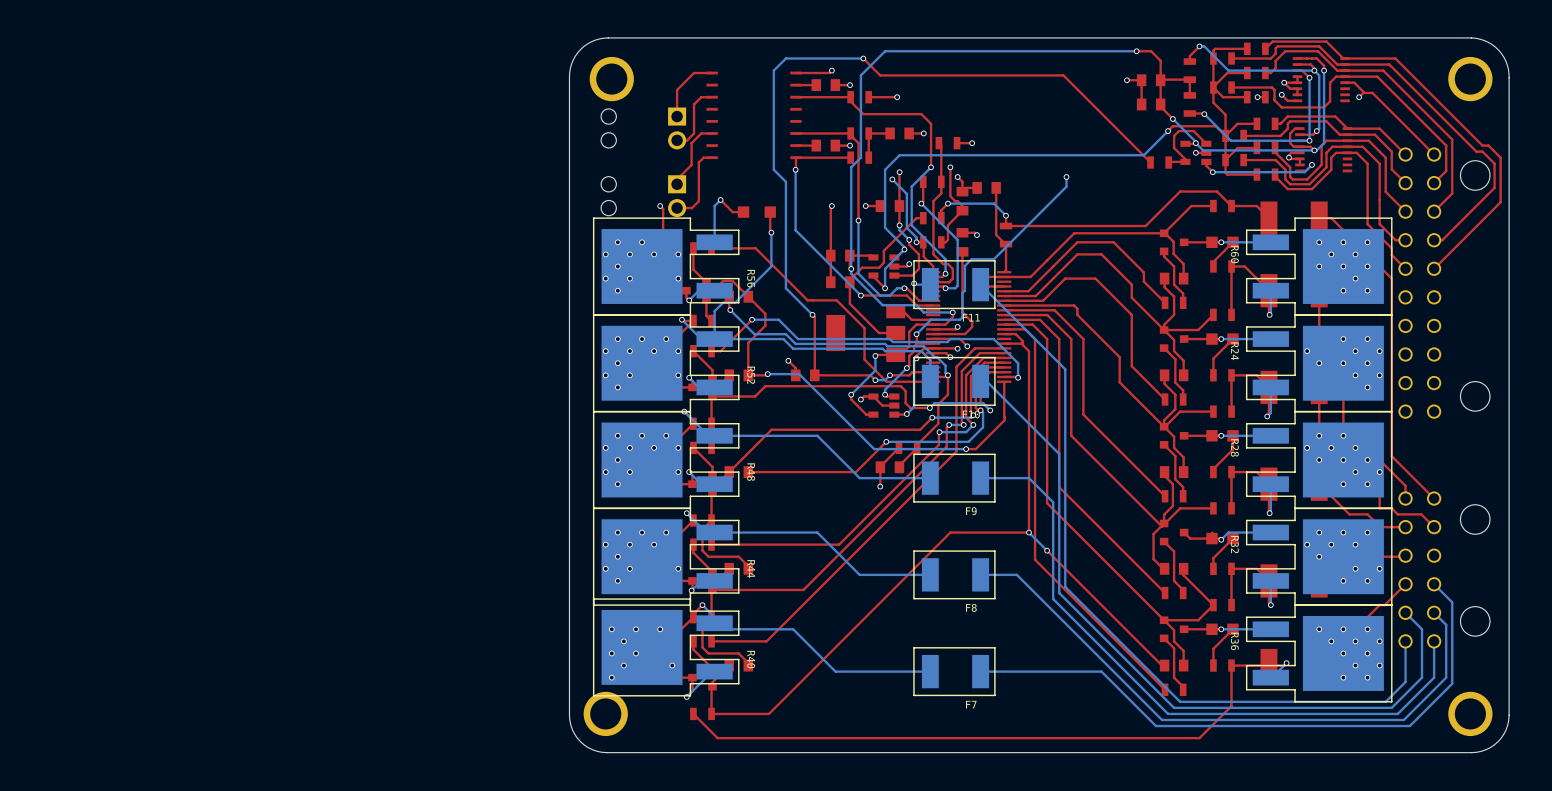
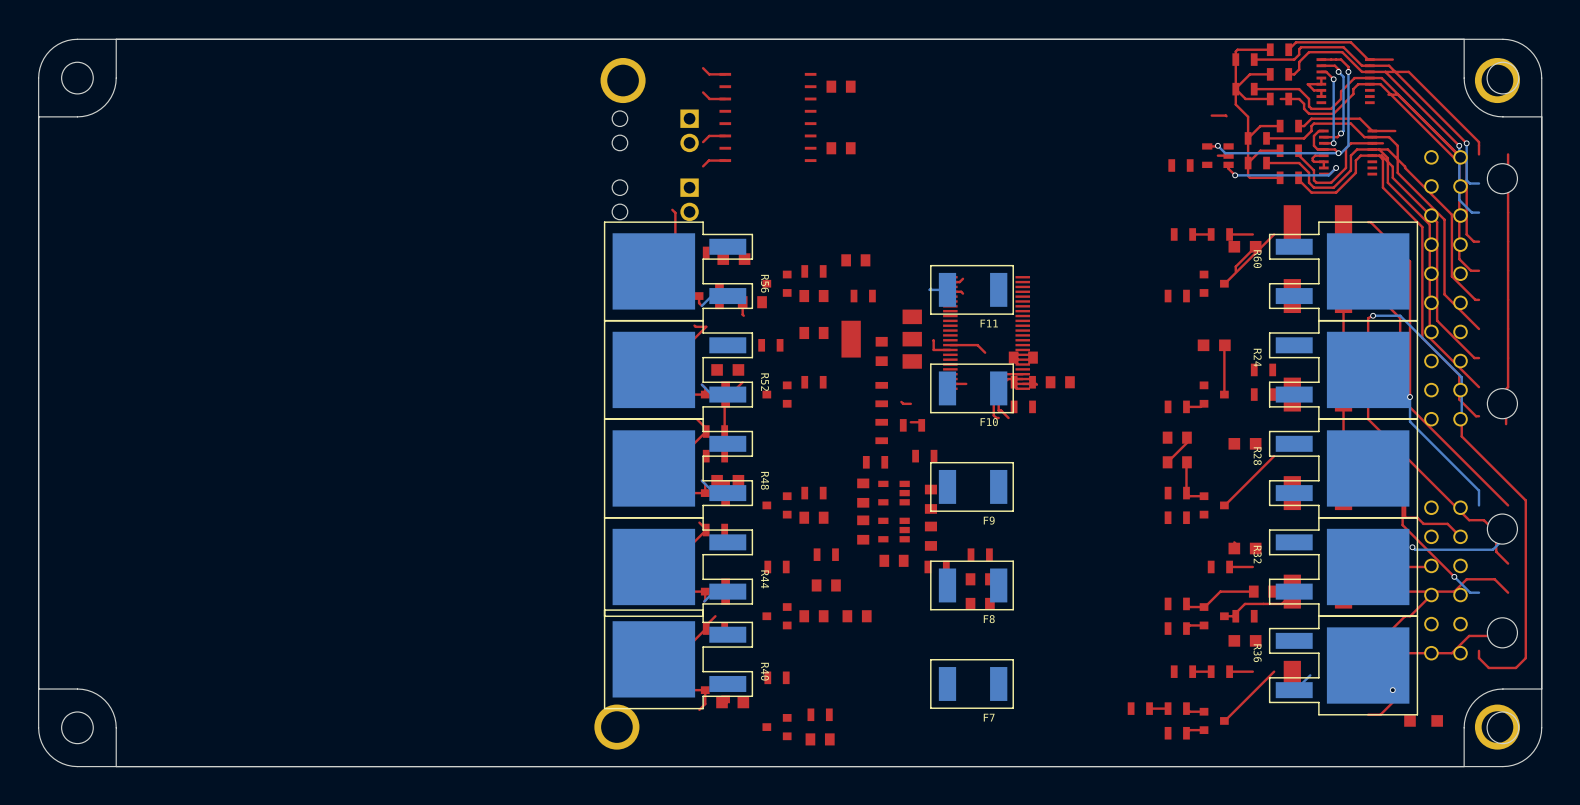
board edge: (1471, 37) (608, 37) (595, 40) (584, 46) (573, 59) (569, 76) (569, 715) (570, 724) (577, 737) (588, 747) (606, 752) (1471, 752) (1481, 751) (1494, 744) (1504, 733) (1509, 715) (1508, 73) (1505, 60) (1495, 47) (1484, 40) (1471, 37) -> (1502, 39) (1517, 42) (1530, 50) (1538, 63) (1541, 78) (1541, 727) (1540, 737) (1533, 751) (1517, 763) (1502, 766) (77, 766) (58, 761) (46, 751) (41, 742) (38, 727) (38, 78) (43, 58) (53, 47) (62, 42) (77, 39) (1502, 39)
board edge: none -> (116, 39) (115, 83) (111, 97) (104, 105) (92, 113) (82, 116) (38, 116)
board edge: none -> (1464, 39) (1464, 83) (1467, 92) (1475, 105) (1488, 113) (1497, 116) (1541, 116)
top track: (1199, 46) (1189, 56) (1189, 61) -> none
bottom track: (1199, 46) (1204, 46) (1228, 70) (1314, 70) -> none
via: (1199, 46) -> none
top track: (1136, 51) (1151, 51) (1160, 60) (1160, 106) (1172, 118) -> none
bottom track: (1136, 51) (885, 51) (860, 75) (860, 157) (851, 167) (851, 273) (882, 305) (916, 305) (923, 312) (952, 312) -> none
via: (1136, 51) -> none
top track: (863, 58) (880, 75) (1063, 75) (1150, 162) -> none
bottom track: (863, 58) (785, 58) (773, 70) (773, 169) (785, 181) (785, 288) (812, 314) -> none
via: (863, 58) -> none
top track: (1367, 58) (1395, 58) (1482, 145) (1488, 145) (1500, 157) (1500, 202) (1434, 268) -> none
round board edge: none -> [61, 61, 94, 95]
round board edge: none -> [1486, 61, 1520, 95]
top track: (1363, 64) (1389, 64) (1476, 151) (1482, 151) (1494, 163) (1494, 187) (1442, 240) (1434, 240) -> (1389, 65) (1466, 143)
top track: (831, 70) (829, 73) (795, 73) -> none
via: (831, 70) -> none
part: (1189, 70) -> none
top track: none -> (1385, 71) (1459, 145)
top track: (696, 73) (694, 73) (677, 89) (677, 116) -> (709, 74) (703, 68)
top track: (1336, 76) (1330, 82) (1330, 101) (1324, 107) (1281, 107) (1274, 100) (1274, 89) (1272, 87) -> (1360, 78) (1354, 78) (1341, 91) (1341, 99) (1331, 108) (1311, 108) (1309, 106) (1309, 99) (1299, 89) (1295, 89)
top track: (1356, 76) (1377, 76) (1446, 145) (1446, 171) (1434, 183) -> (1381, 78) (1466, 163) (1466, 234) (1473, 241) (1478, 241)
top track: (1126, 80) (1141, 80) (1141, 104) -> none
via: (1126, 80) -> none
part: (1151, 80) -> none
top track: (1160, 80) (1189, 79) (1189, 95) -> none
via: (1284, 82) -> none
top track: none -> (1369, 84) (1358, 84) (1353, 89) (1353, 94) (1333, 113) (1309, 113) (1299, 99) (1288, 99)
top track: (1354, 82) (1363, 92) (1359, 97) -> (1379, 84) (1459, 163) (1459, 259) (1470, 270) (1478, 270)
top track: (816, 85) (795, 85) -> none
top track: (850, 85) (835, 85) -> none
via: (850, 85) -> none
top track: (1281, 94) (1287, 100) (1297, 100) -> none
via: (1281, 94) -> none
top track: (701, 97) (694, 104) (694, 133) (687, 140) (677, 140) -> (714, 99) (709, 99) (703, 92)
top track: (795, 97) (850, 97) (850, 101) (863, 114) (921, 114) (931, 123) (931, 167) -> none
part: (859, 97) -> none
top track: (897, 97) (868, 97) -> none
via: (897, 97) -> none
via: (1257, 97) -> none
via: (1359, 97) -> none
part: (1151, 104) -> none
part: (1189, 104) -> none
bottom track: (1204, 114) (1230, 140) (1309, 140) -> none
via: (1204, 114) -> none
bottom track: (1172, 118) (1195, 143) -> none
via: (1172, 118) -> none
top track: (1370, 128) (1379, 128) (1405, 154) -> none
top track: (1168, 131) (1172, 126) (1215, 126) (1225, 135) -> none
bottom track: (1168, 131) (1143, 155) (899, 155) (885, 169) (885, 227) (904, 247) (904, 249) (885, 268) (885, 288) -> none
via: (1168, 131) -> none
top track: (701, 133) (691, 143) (691, 164) (677, 179) (677, 184) -> (714, 135) (709, 135) (703, 142)
top track: (795, 133) (850, 133) (858, 143) (858, 220) -> none
part: (859, 133) -> none
top track: (890, 133) (868, 133) (868, 157) -> none
part: (899, 133) -> none
top track: (923, 133) (909, 133) -> none
via: (923, 133) -> none
top track: (1363, 134) (1374, 134) (1391, 151) (1391, 169) (1405, 183) -> (1389, 137) (1397, 145) (1397, 172) (1444, 219) (1444, 294) (1478, 328)
top track: (1357, 140) (1368, 140) (1385, 157) (1385, 191) (1405, 211) -> none
bottom track: none -> (1466, 143) (1466, 180) (1469, 183) (1478, 183)
via: none -> (1466, 143)
top track: (938, 143) (941, 145) (941, 193) (933, 201) (933, 254) (943, 264) (947, 264) (952, 268) (952, 278) (949, 282) (933, 281) -> none
part: (947, 143) -> none
top track: (972, 143) (957, 143) -> none
via: (972, 143) -> none
top track: (1206, 143) (1193, 131) (1178, 131) (1174, 135) (1174, 147) (1185, 159) (1185, 161) (1168, 162) -> none
bottom track: none -> (1459, 145) (1459, 199) (1471, 212) (1478, 212)
via: none -> (1459, 145)
top track: (816, 145) (795, 145) -> none
top track: (850, 145) (835, 145) -> none
via: (850, 145) -> none
top track: none -> (1379, 149) (1387, 158) (1387, 182) (1429, 224) (1429, 337) (1478, 387)
top track: (1452, 151) (1452, 193) (1434, 211) -> none
top track: none -> (1508, 154) (1508, 387) (1506, 389) (1506, 424)
via: (1195, 152) -> none
top track: none -> (1379, 155) (1382, 159) (1382, 187) (1422, 227) (1422, 337) (1459, 374) (1459, 399) (1476, 416) (1478, 416)
top track: (703, 157) (698, 162) (698, 201) (691, 208) (677, 208) -> (716, 160) (708, 160) (703, 166)
top track: (850, 157) (795, 157) (795, 169) -> none
part: (859, 157) -> none
via: (1288, 157) -> none
top track: (1379, 164) (1379, 224) (1395, 240) (1405, 240) -> (1405, 167) (1451, 214) (1451, 276) (1475, 299) (1478, 299)
bottom track: (931, 167) (911, 186) (911, 225) (945, 259) (945, 273) -> none
via: (931, 167) -> none
top track: (950, 167) (950, 196) (962, 206) (962, 210) (947, 225) (947, 239) (941, 242) -> none
via: (950, 167) -> none
bottom track: (795, 169) (795, 230) (860, 295) -> none
via: (795, 169) -> none
top track: (899, 172) (899, 225) -> none
via: (899, 172) -> none
top track: (1367, 174) (1367, 224) (1391, 248) (1391, 255) (1405, 268) -> (1392, 177) (1437, 222) (1437, 320) (1474, 358) (1478, 358)
top track: (957, 177) (962, 181) (962, 191) (966, 187) (977, 187) -> none
via: (957, 177) -> none
bottom track: (1066, 177) (1066, 186) (993, 259) (971, 259) (964, 265) (962, 317) (960, 319) (931, 319) (916, 334) -> none
via: (1066, 177) -> none
bottom track: (892, 179) (906, 193) (906, 227) (916, 237) (916, 242) -> none
via: (892, 179) -> none
top track: (923, 181) (923, 201) (921, 203) -> none
part: (932, 181) -> none
part: (986, 187) -> none
top track: (996, 187) (996, 234) (1006, 244) (1006, 270) (1004, 272) -> none
top track: (720, 199) (732, 212) (743, 212) -> none
bottom track: (720, 199) (714, 205) (714, 242) -> none
via: (720, 199) -> none
part: (962, 201) -> none
bottom track: (921, 203) (957, 239) (957, 285) (955, 288) (945, 288) -> none
via: (921, 203) -> none
top track: (947, 203) (941, 210) (941, 218) -> none
bottom track: (947, 203) (993, 203) (1006, 215) -> none
via: (947, 203) -> none
via: (660, 206) -> none
top track: (831, 206) (830, 282) -> none
via: (831, 206) -> none
via: (865, 206) -> none
top track: (880, 206) (865, 206) -> none
part: (889, 206) -> none
top track: (1213, 206) (1191, 206) (1164, 233) -> none
part: (1222, 206) -> none
part: (756, 212) -> none
top track: (770, 212) (771, 232) -> none
top track: (1006, 215) (1006, 226) (1145, 226) (1180, 191) (1217, 191) (1231, 206) (1256, 206) (1268, 218) -> none
via: (1006, 215) -> none
top track: (923, 218) (916, 218) (883, 250) (883, 262) (879, 267) (862, 267) (849, 279) (849, 303) (879, 333) (895, 333) -> none
part: (932, 218) -> none
top track: (1313, 218) (1331, 218) (1391, 278) (1391, 456) (1434, 498) -> none
top track: none -> (1368, 222) (1370, 222) (1410, 261) (1410, 397)
bottom track: (858, 220) (858, 273) (880, 295) (889, 295) (897, 288) (904, 288) -> none
via: (858, 220) -> none
bottom track: (899, 225) (899, 230) (909, 239) -> none
via: (899, 225) -> none
part: none -> (1183, 234)
top track: none -> (1211, 234) (1192, 234)
part: none -> (1220, 234)
top track: none -> (1252, 234) (1229, 234)
top track: none -> (1274, 234) (1224, 283)
bottom track: (771, 232) (771, 266) (735, 302) (723, 302) (714, 311) (714, 339) -> none
via: (771, 232) -> none
top track: (962, 232) (974, 232) (977, 235) -> none
via: (977, 235) -> none
part: (1006, 235) -> none
top track: (909, 239) (909, 244) (918, 254) (918, 268) (912, 275) (894, 275) -> none
via: (909, 239) -> none
via: (617, 242) -> none
via: (642, 242) -> none
top track: (916, 242) (923, 242) (923, 256) (933, 266) (933, 272) -> none
via: (916, 242) -> none
part: (932, 242) -> none
part: (962, 242) -> none
part: (1174, 242) -> none
top track: (1221, 242) (1184, 242) -> none
via: (1221, 242) -> none
bottom track: (1270, 242) (1221, 242) -> none
via: (1319, 242) -> none
via: (1343, 242) -> none
via: (1367, 242) -> none
top track: (693, 248) (693, 269) (706, 281) -> none
top track: (711, 248) (755, 248) (807, 300) (836, 300) (864, 328) (864, 359) (886, 381) (933, 381) -> none
via: (904, 249) -> none
top track: (962, 251) (962, 312) (972, 322) (972, 326) (965, 334) (933, 334) -> none
top track: (1164, 251) (1164, 256) (1174, 266) (1174, 284) (1183, 293) (1183, 302) -> none
via: (605, 254) -> none
via: (629, 254) -> none
via: (654, 254) -> none
via: (678, 254) -> none
part: none -> (733, 259)
via: (1331, 254) -> none
via: (1355, 254) -> none
top track: (873, 257) (871, 255) (849, 255) (851, 268) -> none
top track: (909, 264) (906, 266) (894, 266) -> none
via: (909, 264) -> none
via: (617, 266) -> none
part: none -> (813, 271)
part: (883, 266) -> none
part: (1222, 266) -> none
via: (1319, 266) -> none
via: (1343, 266) -> none
via: (1367, 266) -> none
via: (851, 268) -> none
via: (945, 273) -> none
top track: (873, 275) (885, 288) -> none
via: (605, 278) -> none
via: (629, 278) -> none
via: (678, 278) -> none
part: none -> (777, 283)
top track: (1164, 278) (1164, 287) (1174, 296) (1174, 314) (1164, 324) (1164, 330) (1198, 330) (1213, 314) -> none
part: (1174, 278) -> none
top track: (1183, 278) (1183, 263) (1173, 253) (1173, 241) (1165, 233) (1074, 233) (1030, 276) (988, 276) (986, 278) (988, 286) (1004, 286) -> none
part: none -> (1214, 283)
top track: none -> (1368, 283) (1368, 286) (1400, 318) (1400, 397) (1508, 505)
via: (1355, 278) -> none
part: (840, 282) -> none
via: (914, 283) -> none
bottom track: (980, 284) (1065, 369) (1065, 586) (1180, 701) (1385, 701) (1405, 682) (1405, 641) -> none
via: (885, 288) -> none
top track: (904, 288) (906, 288) (919, 300) (933, 300) -> none
via: (904, 288) -> none
via: (945, 288) -> none
via: (617, 290) -> none
part: none -> (813, 296)
part: none -> (863, 296)
bottom track: (1270, 290) (1269, 314) -> none
via: (1343, 290) -> none
via: (1367, 290) -> none
top track: (1004, 291) (1028, 291) (1077, 242) (1113, 242) (1143, 272) (1143, 281) (1165, 302) -> none
top track: (860, 295) (906, 295) (916, 305) (933, 305) -> none
via: (860, 295) -> none
top track: (1004, 296) (1035, 296) (1077, 254) (1101, 254) (1131, 284) (1131, 297) (1174, 340) (1174, 351) (1183, 360) (1183, 375) -> none
via: (689, 300) -> none
top track: (1004, 300) (1043, 300) (1065, 278) (1095, 278) (1131, 314) (1131, 366) (1165, 399) -> (1204, 403) (1200, 406) (1186, 406)
part position: (1174, 302) -> (1177, 296)
top track: (1004, 305) (1074, 305) (1077, 308) (1077, 314) (1119, 357) (1119, 382) (1174, 436) (1174, 447) (1183, 457) (1183, 472) -> none
bottom track: (730, 310) (754, 334) (785, 334) (795, 343) (885, 343) (887, 346) (923, 346) (945, 365) (945, 372) (947, 375) -> none
via: (730, 310) -> none
top track: (1004, 310) (1054, 310) (1083, 339) (1083, 414) (1165, 496) -> none
top track: none -> (1373, 315) (1368, 318) (1368, 345)
bottom track: none -> (1373, 315) (1400, 315) (1461, 377) (1461, 419)
via: none -> (1373, 315)
top track: (895, 311) (903, 311) (911, 319) (933, 319) -> none
top track: (952, 312) (952, 317) (945, 324) (916, 324) (909, 331) (909, 346) (900, 354) (875, 355) -> none
via: (952, 312) -> none
top track: (812, 314) (814, 317) (814, 375) (870, 375) (875, 380) -> none
via: (812, 314) -> none
part: (1222, 314) -> none
top track: (1269, 314) (1268, 290) (1244, 266) (1231, 266) (1231, 314) -> none
via: (1269, 314) -> none
top track: (1004, 315) (1047, 315) (1071, 339) (1071, 435) (1162, 526) (1164, 523) -> none
bottom track: (681, 319) (701, 339) (783, 339) (793, 348) (882, 348) (885, 351) (921, 351) (930, 360) (930, 381) -> none
via: (681, 319) -> none
top track: (752, 319) (720, 351) (711, 351) -> none
bottom track: (752, 319) (778, 319) (798, 339) (889, 339) (892, 342) (947, 342) (950, 339) (993, 339) (1018, 363) (1018, 377) -> none
via: (752, 319) -> none
top track: (1004, 319) (1039, 319) (1059, 339) (1059, 487) (1165, 593) -> (1253, 591) (1220, 591) (1204, 607) (1189, 607) (1186, 603)
part: (702, 320) -> none
top track: (711, 320) (706, 315) (706, 297) (723, 281) (732, 281) (765, 313) (765, 325) (748, 342) (748, 375) (767, 374) -> none
top track: (1004, 324) (1032, 324) (1047, 339) (1047, 503) (1174, 630) (1174, 641) (1183, 650) (1183, 665) -> none
part: none -> (813, 332)
top track: (957, 326) (955, 329) (933, 329) -> none
via: (957, 326) -> none
top track: (1004, 329) (1025, 329) (1035, 339) (1035, 559) (1165, 689) -> none
via: (916, 334) -> none
top track: (1004, 334) (1015, 334) (1022, 341) (1022, 345) -> none
via: (617, 339) -> none
via: (642, 339) -> none
via: (666, 339) -> none
part: none -> (770, 345)
part: (1174, 339) -> none
top track: none -> (1224, 345) (1224, 394)
top track: (1221, 339) (1184, 339) -> none
via: (1221, 339) -> none
part position: (1222, 339) -> (1214, 345)
top track: (1232, 339) (1213, 358) (1213, 375) -> none
bottom track: (1270, 339) (1221, 339) -> none
via: (1343, 339) -> none
via: (1367, 339) -> none
top track: (916, 343) (914, 346) (914, 351) (909, 355) (909, 365) (906, 368) -> none
top track: (1004, 343) (1021, 343) (1029, 351) (1029, 532) (950, 532) (769, 713) (711, 713) (712, 682) (729, 665) -> none
part: none -> (881, 351)
via: (967, 346) -> none
top track: (957, 348) (924, 348) (916, 358) -> none
via: (957, 348) -> none
top track: (1004, 348) (974, 348) (956, 366) (956, 451) (766, 641) (711, 641) -> none
top track: (1164, 348) (1175, 359) (1175, 382) (1183, 390) (1183, 399) -> none
via: (605, 351) -> none
via: (629, 351) -> none
via: (654, 351) -> none
via: (678, 351) -> none
top track: (693, 351) (712, 370) (712, 378) -> none
part: (702, 351) -> none
part: none -> (1023, 357)
via: (1307, 351) -> none
via: (1355, 351) -> none
via: (1379, 351) -> none
top track: (1004, 353) (979, 353) (961, 371) (961, 423) (963, 424) -> none
bottom track: (875, 355) (875, 370) (851, 394) -> none
via: (875, 355) -> none
top track: (950, 357) (946, 353) (933, 353) (933, 357) -> none
via: (950, 357) -> none
top track: (1004, 357) (983, 357) (966, 375) (966, 417) (973, 424) -> none
bottom track: (916, 358) (914, 360) (914, 406) (906, 414) -> none
via: (916, 358) -> none
top track: (788, 360) (795, 368) (795, 375) -> none
via: (788, 360) -> none
top track: (1004, 362) (984, 362) (970, 376) (970, 412) (973, 415) -> none
via: (617, 363) -> none
part: none -> (727, 369)
part: none -> (1263, 369)
via: (1319, 363) -> none
via: (1343, 363) -> none
via: (1367, 363) -> none
bottom track: (906, 368) (885, 389) (885, 394) -> none
via: (906, 368) -> none
part footprint: [791, 369, 820, 382] -> [801, 375, 827, 389]
top track: (933, 372) (912, 372) (909, 375) (889, 375) -> none
bottom track: (767, 374) (799, 374) (874, 449) (966, 449) -> none
via: (767, 374) -> none
via: (605, 375) -> none
via: (629, 375) -> none
via: (678, 375) -> none
part: (738, 375) -> none
bottom track: (889, 375) (885, 380) (875, 380) -> none
via: (889, 375) -> none
top track: (947, 375) (947, 394) (938, 404) (938, 423) (917, 444) (917, 447) (899, 467) -> none
via: (947, 375) -> none
part: none -> (1023, 382)
part: none -> (1060, 382)
top track: (1164, 375) (1164, 383) (1175, 394) (1175, 409) (1164, 420) (1164, 426) (1180, 411) (1213, 411) -> none
part: (1174, 375) -> none
part: (1222, 375) -> none
via: (1355, 375) -> none
via: (1379, 375) -> none
via: (689, 377) -> none
via: (1018, 377) -> none
via: (875, 380) -> none
bottom track: (980, 381) (986, 381) (1059, 453) (1059, 593) (1174, 707) (1391, 707) (1422, 677) (1422, 629) (1405, 612) -> none
top track: (1004, 381) (1004, 420) (975, 449) (966, 449) -> none
via: (617, 387) -> none
part: none -> (777, 394)
part: none -> (881, 394)
part: none -> (1214, 394)
part: none -> (1263, 394)
bottom track: (1270, 387) (1270, 412) (1267, 416) -> none
via: (1367, 387) -> none
bottom track: none -> (1410, 397) (1410, 421) (1478, 490) (1478, 505)
via: none -> (1410, 397)
top track: (851, 394) (851, 399) (866, 414) (873, 414) -> none
via: (851, 394) -> none
via: (885, 394) -> none
top track: (712, 396) (755, 396) (765, 386) (900, 386) (905, 391) (905, 403) (910, 407) (929, 407) -> none
top track: (860, 399) (863, 396) (873, 396) (882, 405) (894, 405) -> none
via: (860, 399) -> none
part: none -> (1023, 406)
part position: (1174, 399) -> (1177, 406)
part: (883, 405) -> none
bottom track: (929, 407) (934, 403) (983, 403) (990, 410) -> none
via: (929, 407) -> none
bottom track: (980, 410) (983, 412) (983, 427) (968, 441) (886, 441) -> none
via: (980, 410) -> none
via: (990, 410) -> none
bottom track: (684, 411) (708, 435) (817, 435) (859, 478) (930, 478) -> none
via: (684, 411) -> none
part: (1222, 411) -> none
top track: (1231, 411) (1231, 375) (1256, 375) (1268, 387) (1268, 414) (1267, 416) -> none
top track: (1343, 411) (1343, 423) (1405, 485) (1405, 498) -> (1368, 419) (1469, 520) (1483, 520) (1496, 532) (1496, 551) (1508, 563)
top track: none -> (1461, 419) (1461, 436) (1525, 500) (1525, 658) (1515, 667) (1488, 667) (1478, 658) (1478, 650)
via: (906, 414) -> none
bottom track: (973, 415) (970, 417) (932, 417) -> none
via: (973, 415) -> none
via: (1267, 416) -> none
part: none -> (912, 425)
top track: (932, 417) (920, 429) (771, 429) (712, 488) (711, 520) (702, 529) (702, 550) (708, 556) (738, 556) (748, 566) (748, 568) -> none
via: (932, 417) -> none
part: none -> (881, 431)
top track: (949, 424) (946, 427) (946, 446) (803, 589) (712, 589) -> none
via: (949, 424) -> none
bottom track: (963, 424) (949, 424) -> none
via: (963, 424) -> none
bottom track: (973, 424) (966, 432) (939, 432) -> none
via: (973, 424) -> none
part: none -> (1177, 437)
top track: none -> (1186, 437) (1186, 442) (1167, 462)
top track: (939, 432) (938, 444) (839, 544) (711, 544) -> none
via: (939, 432) -> none
via: (617, 435) -> none
via: (642, 435) -> none
via: (666, 435) -> none
part: (1174, 435) -> none
top track: (1221, 435) (1184, 435) -> none
via: (1221, 435) -> none
top track: (1232, 435) (1232, 449) (1213, 469) (1213, 472) -> none
bottom track: (1270, 435) (1221, 435) -> none
via: (1319, 435) -> none
via: (1343, 435) -> none
top track: (886, 441) (856, 472) (748, 472) -> none
via: (886, 441) -> none
top track: (1164, 444) (1175, 456) (1175, 479) (1183, 487) (1183, 496) -> none
via: (605, 447) -> none
via: (629, 447) -> none
via: (654, 447) -> none
via: (678, 447) -> none
top track: (693, 447) (712, 466) (712, 475) -> none
top track: (899, 447) (880, 466) (880, 486) -> none
top track: none -> (1274, 456) (1224, 505)
via: (1307, 447) -> none
via: (1331, 447) -> none
via: (1355, 447) -> none
via: (966, 449) -> none
part: none -> (875, 462)
part: none -> (1177, 462)
top track: none -> (1186, 462) (1186, 493) (1189, 496) (1204, 496)
via: (617, 459) -> none
via: (1319, 459) -> none
top track: none -> (1368, 468) (1402, 502) (1402, 525) (1454, 576)
via: (1343, 459) -> none
via: (1367, 459) -> none
part: (889, 467) -> none
via: (605, 472) -> none
via: (629, 472) -> none
via: (678, 472) -> none
via: (689, 472) -> none
part: none -> (727, 480)
part: (738, 472) -> none
top track: (1164, 472) (1164, 475) (1172, 484) (1172, 505) (1164, 514) (1164, 523) -> none
part: (1174, 472) -> none
part: (1222, 472) -> none
via: (1355, 472) -> none
via: (1379, 472) -> none
bottom track: (980, 478) (1029, 478) (1053, 502) (1053, 599) (1168, 713) (1397, 713) (1434, 677) (1434, 641) -> none
via: (617, 484) -> none
part: none -> (813, 493)
part: none -> (863, 493)
part: none -> (894, 493)
part: none -> (1177, 493)
bottom track: (1270, 484) (1269, 513) -> none
top track: (1319, 484) (1349, 514) (1367, 514) (1380, 527) (1405, 527) -> none
via: (1343, 484) -> none
via: (1367, 484) -> none
via: (880, 486) -> none
part: none -> (930, 499)
part: none -> (777, 505)
part: (1174, 496) -> none
part: none -> (1214, 505)
part: none -> (813, 517)
part: none -> (1177, 517)
top track: (1213, 508) (1180, 508) (1164, 523) -> none
part: (1222, 508) -> none
top track: (1231, 508) (1231, 472) (1256, 472) (1268, 484) (1269, 513) -> none
bottom track: (686, 513) (706, 532) (817, 532) (859, 574) (930, 574) -> none
via: (686, 513) -> none
via: (1269, 513) -> none
part: none -> (863, 530)
part: none -> (894, 530)
top track: (1164, 523) (1153, 534) (1153, 559) (1164, 568) -> none
bottom track: none -> (1508, 534) (1492, 549) (1414, 549) (1412, 547)
part: none -> (930, 536)
via: (617, 532) -> none
via: (642, 532) -> none
via: (666, 532) -> none
bottom track: (1029, 532) (1047, 550) -> none
via: (1029, 532) -> none
part: (1174, 532) -> none
top track: (1184, 532) (1190, 538) (1221, 539) -> none
bottom track: (1270, 532) (1228, 532) (1221, 539) -> none
via: (1319, 532) -> none
via: (1343, 532) -> none
via: (1367, 532) -> none
via: none -> (1412, 547)
top track: (1232, 538) (1213, 558) (1213, 568) -> none
via: (1221, 539) -> none
top track: (1164, 541) (1174, 551) (1174, 580) (1183, 589) (1183, 593) -> none
via: (605, 544) -> none
via: (629, 544) -> none
via: (654, 544) -> none
top track: (693, 544) (693, 552) (712, 571) -> none
part: (702, 544) -> none
part: none -> (826, 554)
part: none -> (980, 554)
via: (1307, 544) -> none
via: (1331, 544) -> none
via: (1355, 544) -> none
part: none -> (894, 560)
top track: (1047, 550) (1162, 665) (1164, 665) -> none
via: (1047, 550) -> none
via: (617, 556) -> none
part: none -> (777, 566)
part: none -> (937, 566)
part: none -> (1220, 566)
top track: none -> (1252, 566) (1229, 566)
via: (1319, 556) -> none
bottom track: none -> (1454, 576) (1470, 592) (1478, 592)
via: none -> (1454, 576)
via: (605, 568) -> none
via: (629, 568) -> none
via: (678, 568) -> none
part: (738, 568) -> none
part: none -> (980, 579)
part: (1174, 568) -> none
top track: (1183, 568) (1183, 575) (1213, 605) (1198, 620) (1164, 620) -> none
part: (1222, 568) -> none
top track: none -> (1288, 579) (1288, 597) (1281, 603) (1245, 603) (1232, 616) (1224, 616)
via: (1355, 568) -> none
via: (1379, 568) -> none
part: none -> (826, 585)
bottom track: (980, 574) (1016, 574) (1162, 719) (1403, 719) (1446, 677) (1446, 624) (1434, 612) -> none
via: (617, 580) -> none
part: none -> (1263, 591)
bottom track: (1270, 580) (1270, 605) -> none
top track: none -> (1368, 591) (1454, 591) (1466, 579) (1494, 579) (1508, 592)
via: (1343, 580) -> none
via: (1367, 580) -> none
bottom track: (1434, 584) (1452, 602) (1452, 683) (1409, 726) (1155, 726) (1101, 671) (980, 671) -> none
top track: (712, 589) (711, 617) (702, 626) (702, 647) (708, 653) (738, 653) (748, 662) (748, 665) -> none
via: (691, 590) -> none
part: none -> (980, 603)
part: none -> (1177, 603)
part: (1174, 593) -> none
bottom track: (702, 605) (714, 617) (714, 623) -> none
via: (702, 605) -> none
part: none -> (777, 616)
part: none -> (813, 616)
part: none -> (857, 616)
top track: (1270, 605) (1268, 603) (1268, 580) (1256, 568) (1231, 568) (1231, 605) -> none
via: (1270, 605) -> none
top track: none -> (1508, 621) (1493, 635) (1469, 635) (1451, 653) (1368, 653)
top track: none -> (1204, 625) (1189, 625) (1186, 628)
part: none -> (1177, 628)
via: (611, 629) -> none
via: (635, 629) -> none
via: (660, 629) -> none
bottom track: (703, 629) (793, 629) (835, 671) (930, 671) -> none
part position: (1174, 629) -> (1214, 616)
top track: (1221, 629) (1184, 629) -> none
via: (1221, 629) -> none
top track: (1232, 629) (1213, 648) (1213, 665) -> none
bottom track: (1270, 629) (1221, 629) -> none
via: (1319, 629) -> none
via: (1343, 629) -> none
via: (1367, 629) -> none
top track: (1164, 638) (1174, 648) (1174, 677) (1183, 686) (1183, 689) -> none
via: (623, 641) -> none
top track: (693, 641) (693, 649) (712, 668) -> none
part: (702, 641) -> none
via: (1331, 641) -> none
via: (1355, 641) -> none
via: (1379, 641) -> none
via: (611, 653) -> none
via: (635, 653) -> none
via: (1343, 653) -> none
via: (1367, 653) -> none
part: none -> (1183, 671)
top track: none -> (1211, 671) (1192, 671)
part: none -> (1220, 671)
top track: none -> (1252, 671) (1229, 671)
top track: none -> (1274, 671) (1224, 720)
top track: (1286, 663) (1284, 665) (1231, 665) (1231, 706) (1199, 738) (717, 738) (693, 713) -> none
via: (1286, 663) -> none
via: (623, 665) -> none
via: (672, 665) -> none
part: (738, 665) -> none
part: none -> (777, 677)
part: (1174, 665) -> none
part: (1222, 665) -> none
via: (1355, 665) -> none
via: (1379, 665) -> none
board edge: none -> (38, 689) (82, 689) (96, 694) (104, 700) (111, 708) (115, 722) (116, 766)
board edge: none -> (1541, 689) (1497, 689) (1483, 694) (1475, 700) (1467, 712) (1464, 722) (1464, 766)
via: (611, 677) -> none
bottom track: (714, 677) (706, 677) (686, 697) -> none
via: (1343, 677) -> none
part: none -> (732, 702)
part: (1174, 689) -> none
top track: none -> (1392, 702) (1380, 714) (1368, 714)
part: none -> (1140, 708)
top track: none -> (1168, 708) (1149, 708)
part: none -> (1177, 708)
top track: none -> (1186, 708) (1189, 711) (1204, 711)
via: (686, 697) -> none
round board edge: none -> [61, 711, 94, 745]
round board edge: none -> [1486, 711, 1520, 745]
part: none -> (820, 714)
part: none -> (1214, 720)
part: none -> (1423, 720)
part: (702, 713) -> none
part: none -> (777, 727)
top track: none -> (1204, 730) (1189, 730) (1186, 733)
part: none -> (1177, 733)
part: none -> (820, 739)

